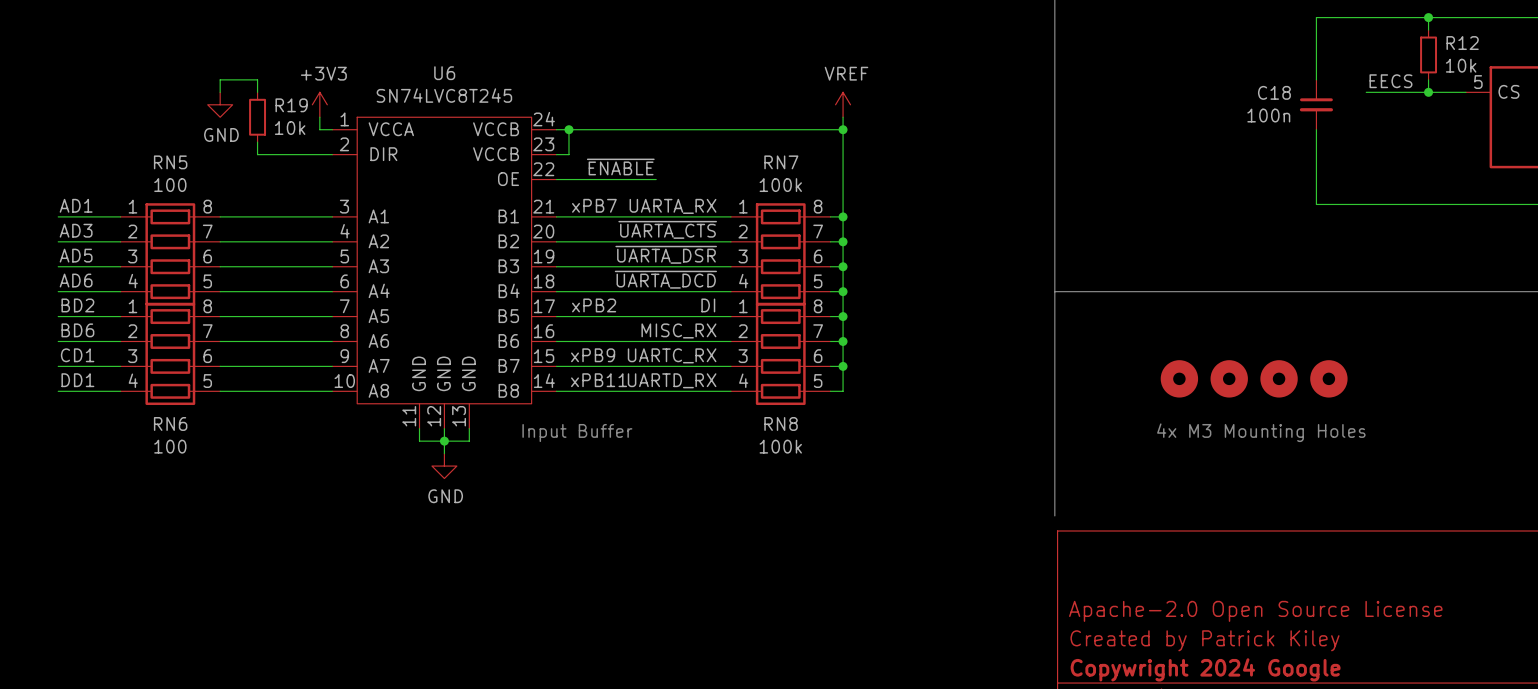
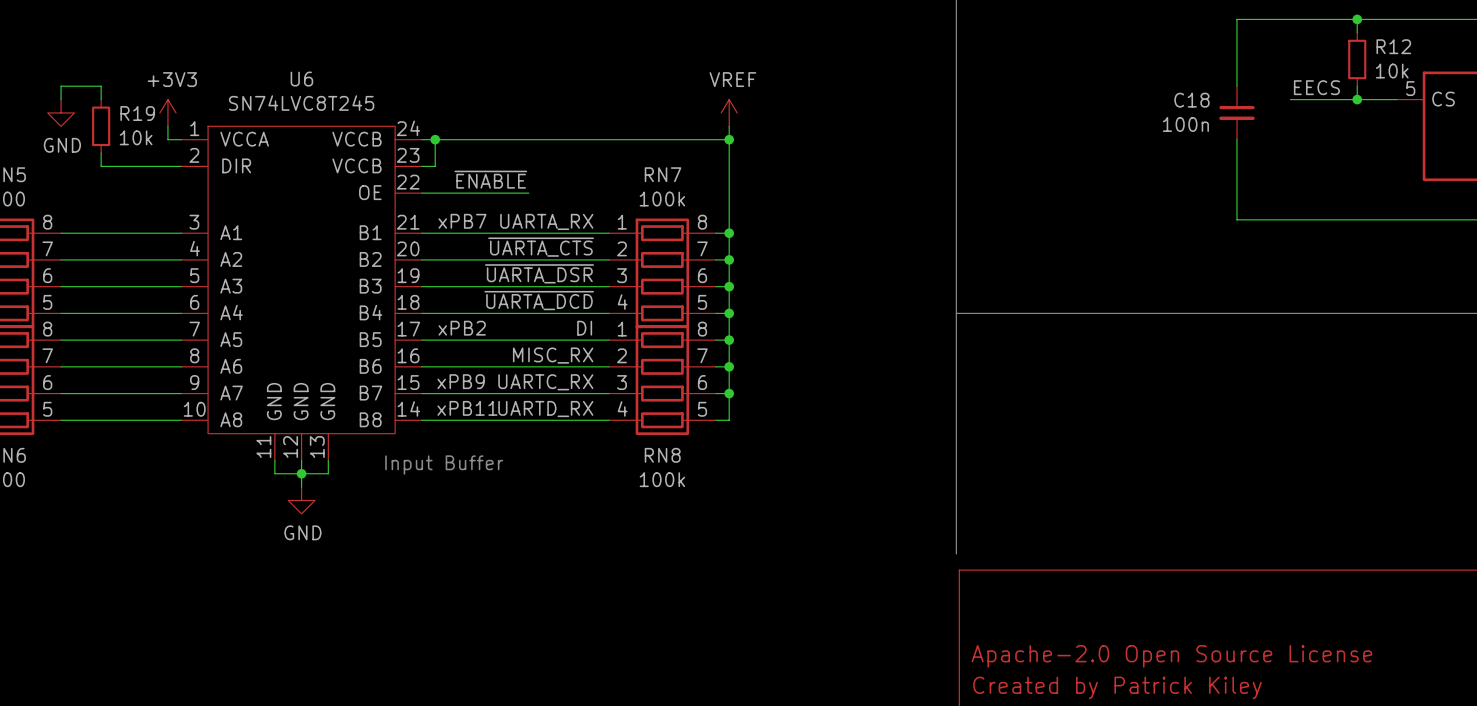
part: (1179, 378) -> none
part: (1229, 378) -> none
part: (1279, 378) -> none
part: (1328, 378) -> none
text: 4x M3 Mounting Holes (1261, 432) -> none

